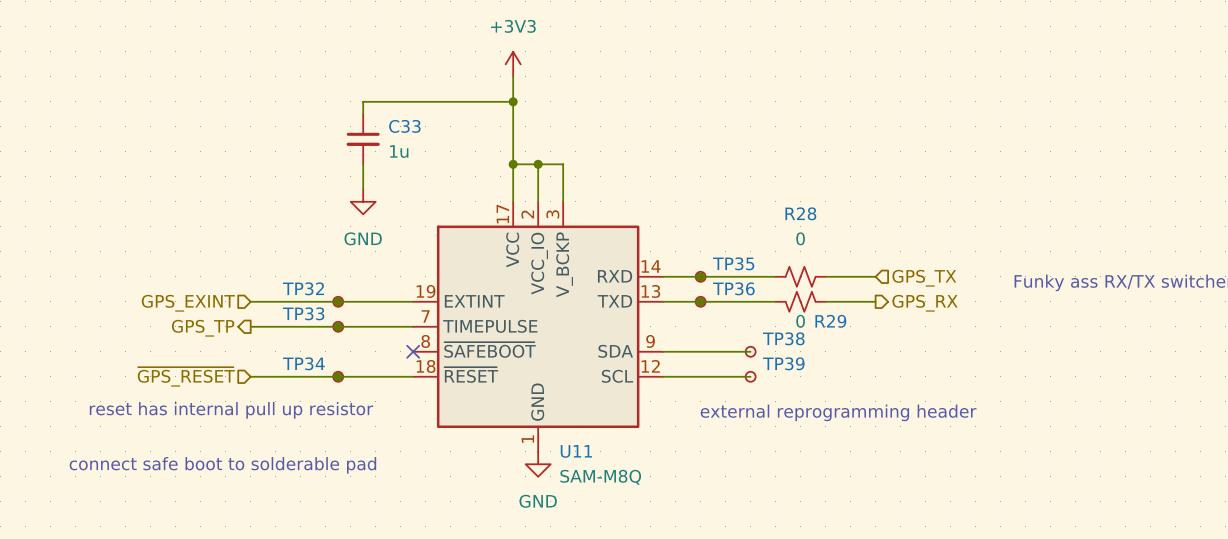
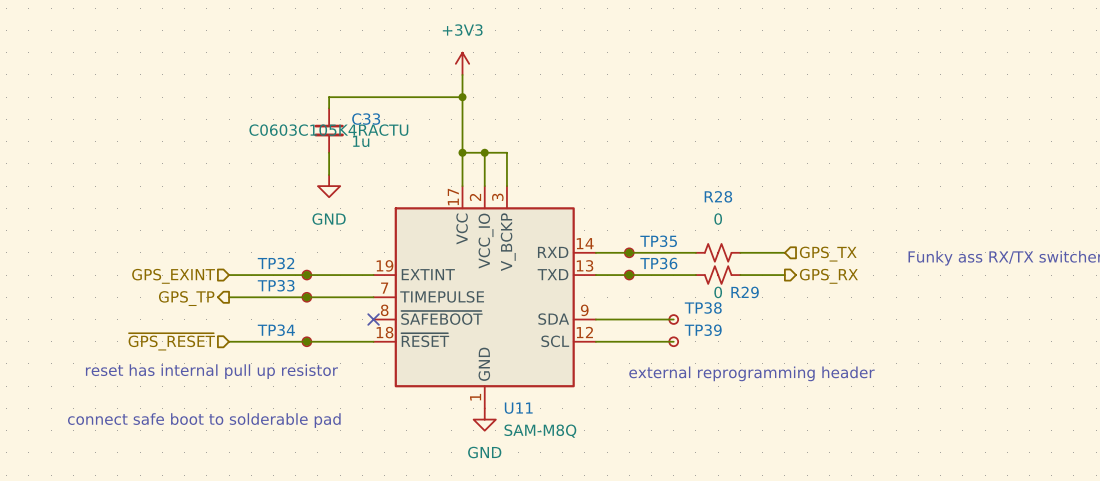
C33 text: none -> C0603C105K4RACTU (328, 130)

